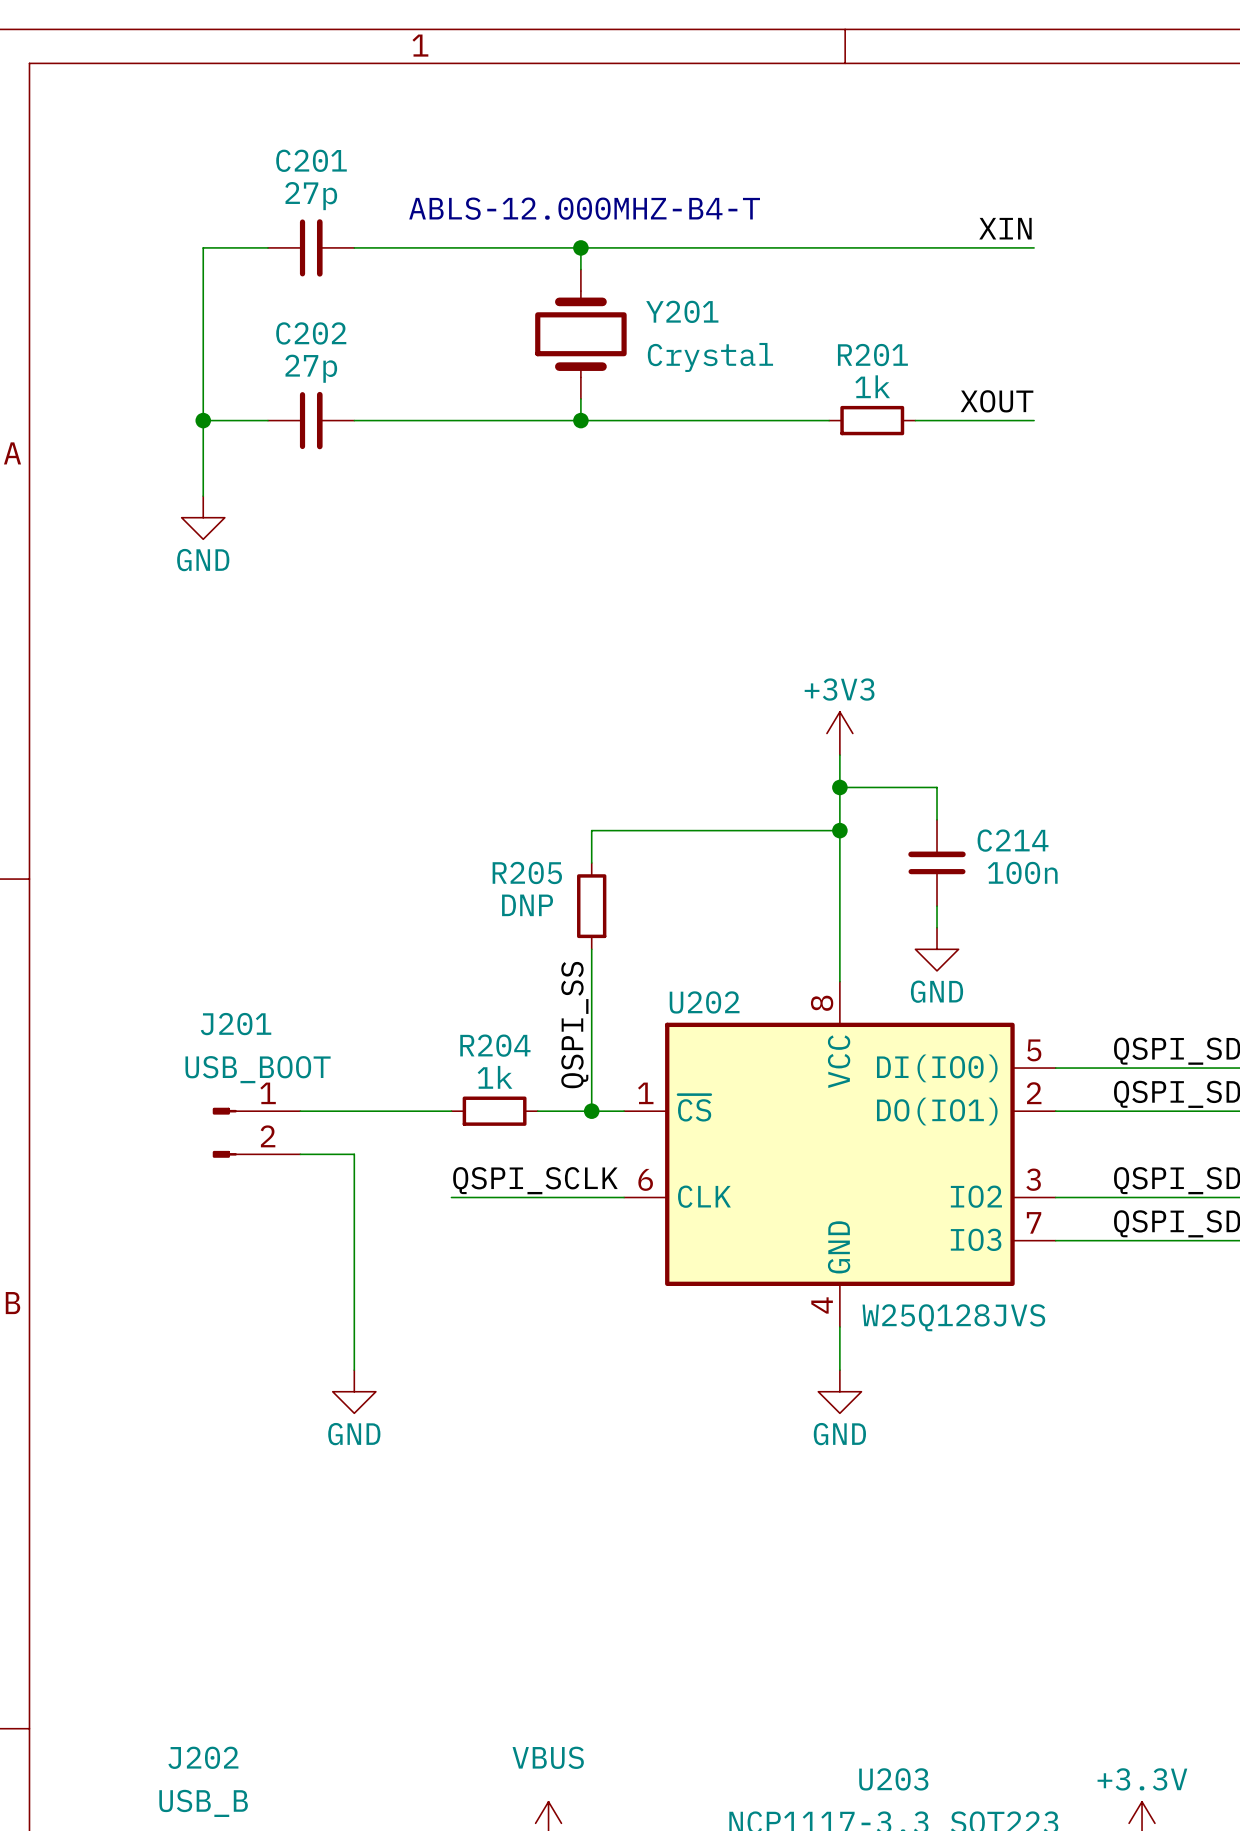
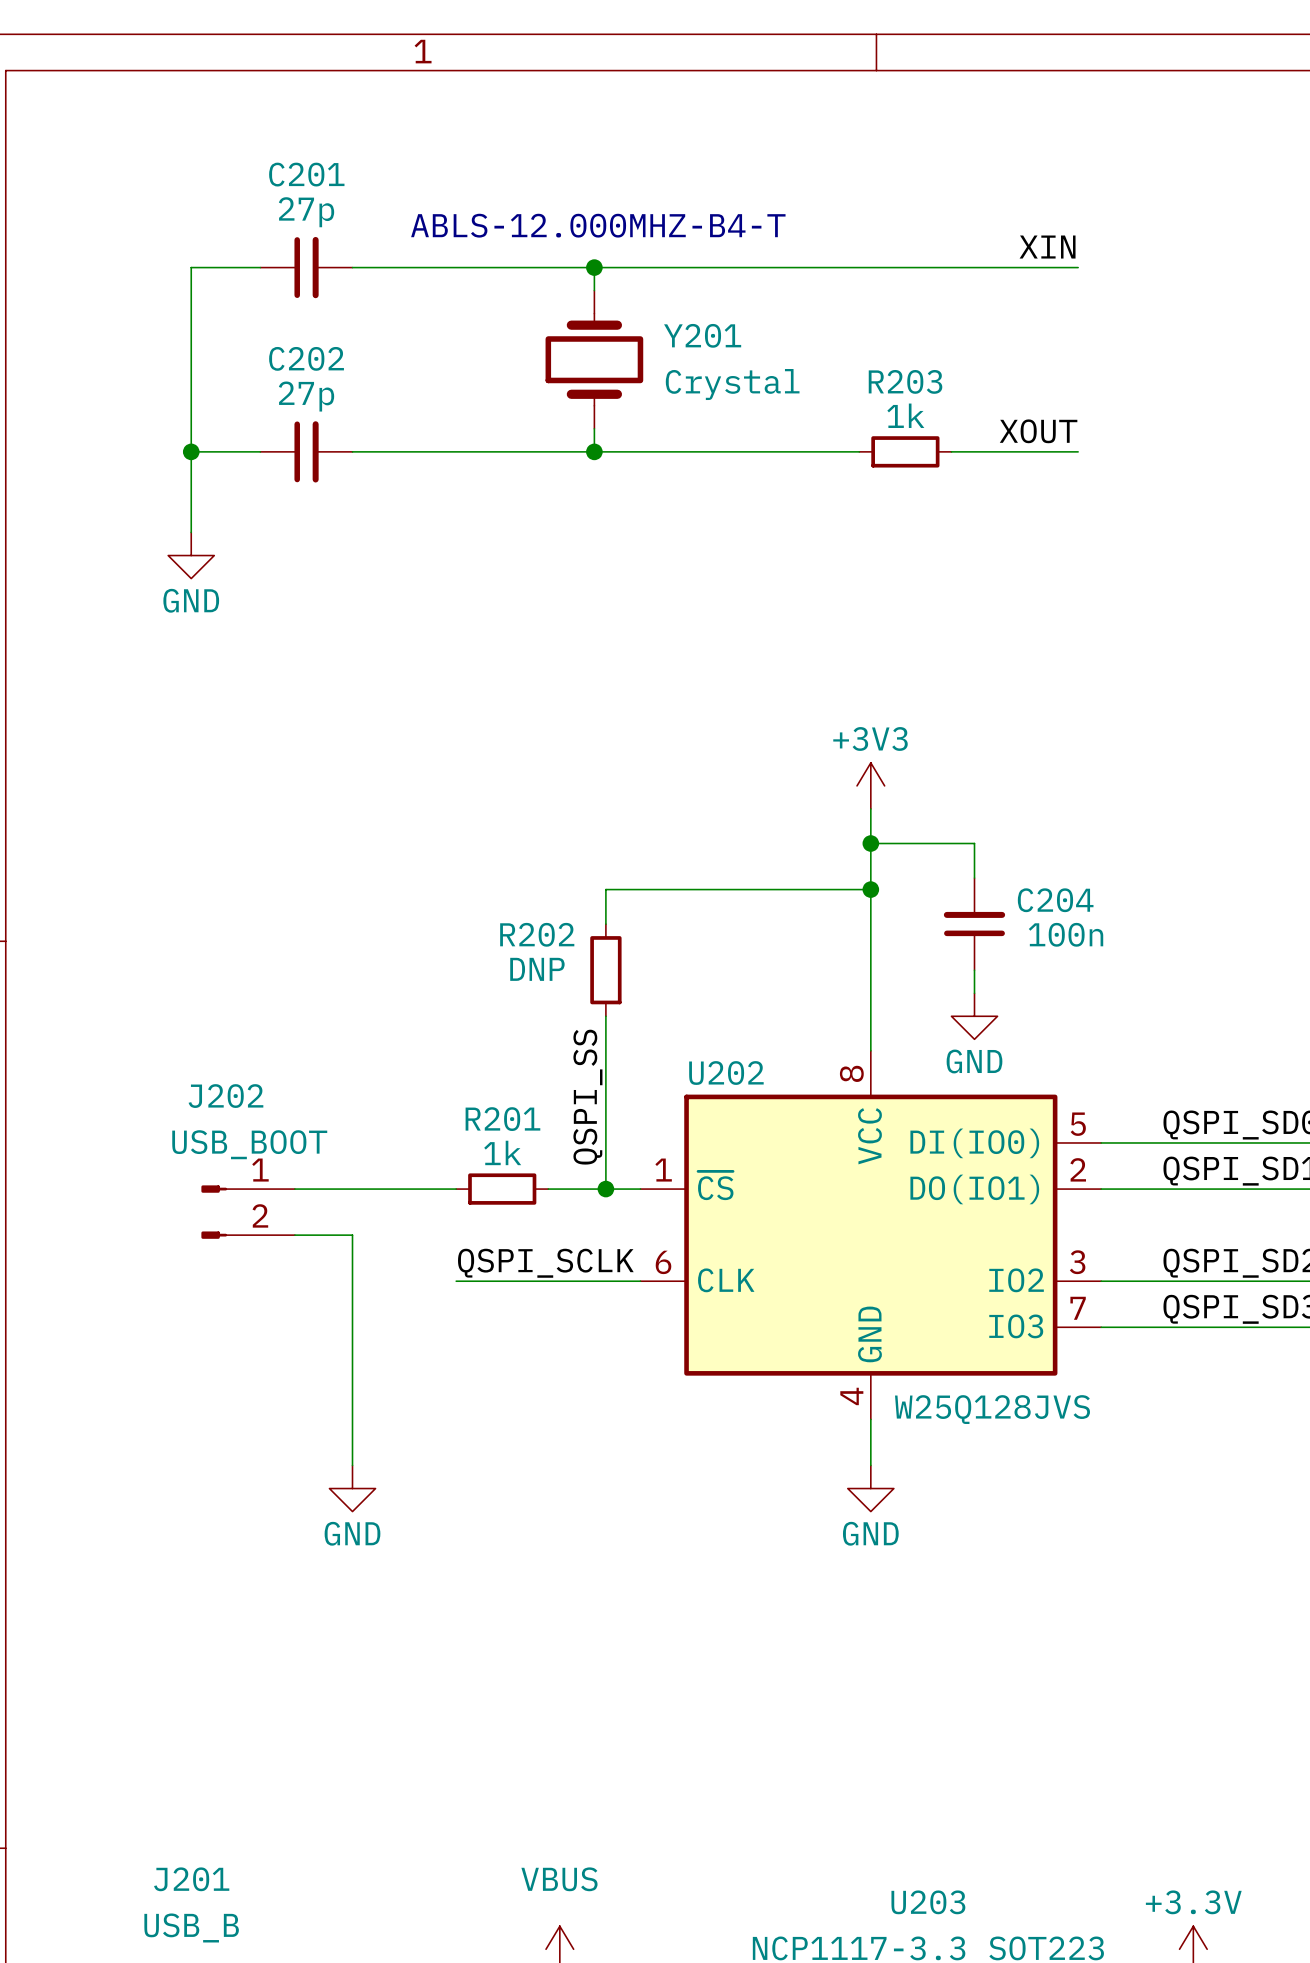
R201 name: R201 (872, 355) -> R203 (905, 381)
C214 name: C214 (1013, 840) -> C204 (1055, 900)
R205 name: R205 (527, 872) -> R202 (537, 934)
J201 name: J201 (236, 1024) -> J202 (225, 1096)
R204 name: R204 (495, 1045) -> R201 (502, 1119)
J202 name: J202 (203, 1757) -> J201 (191, 1879)

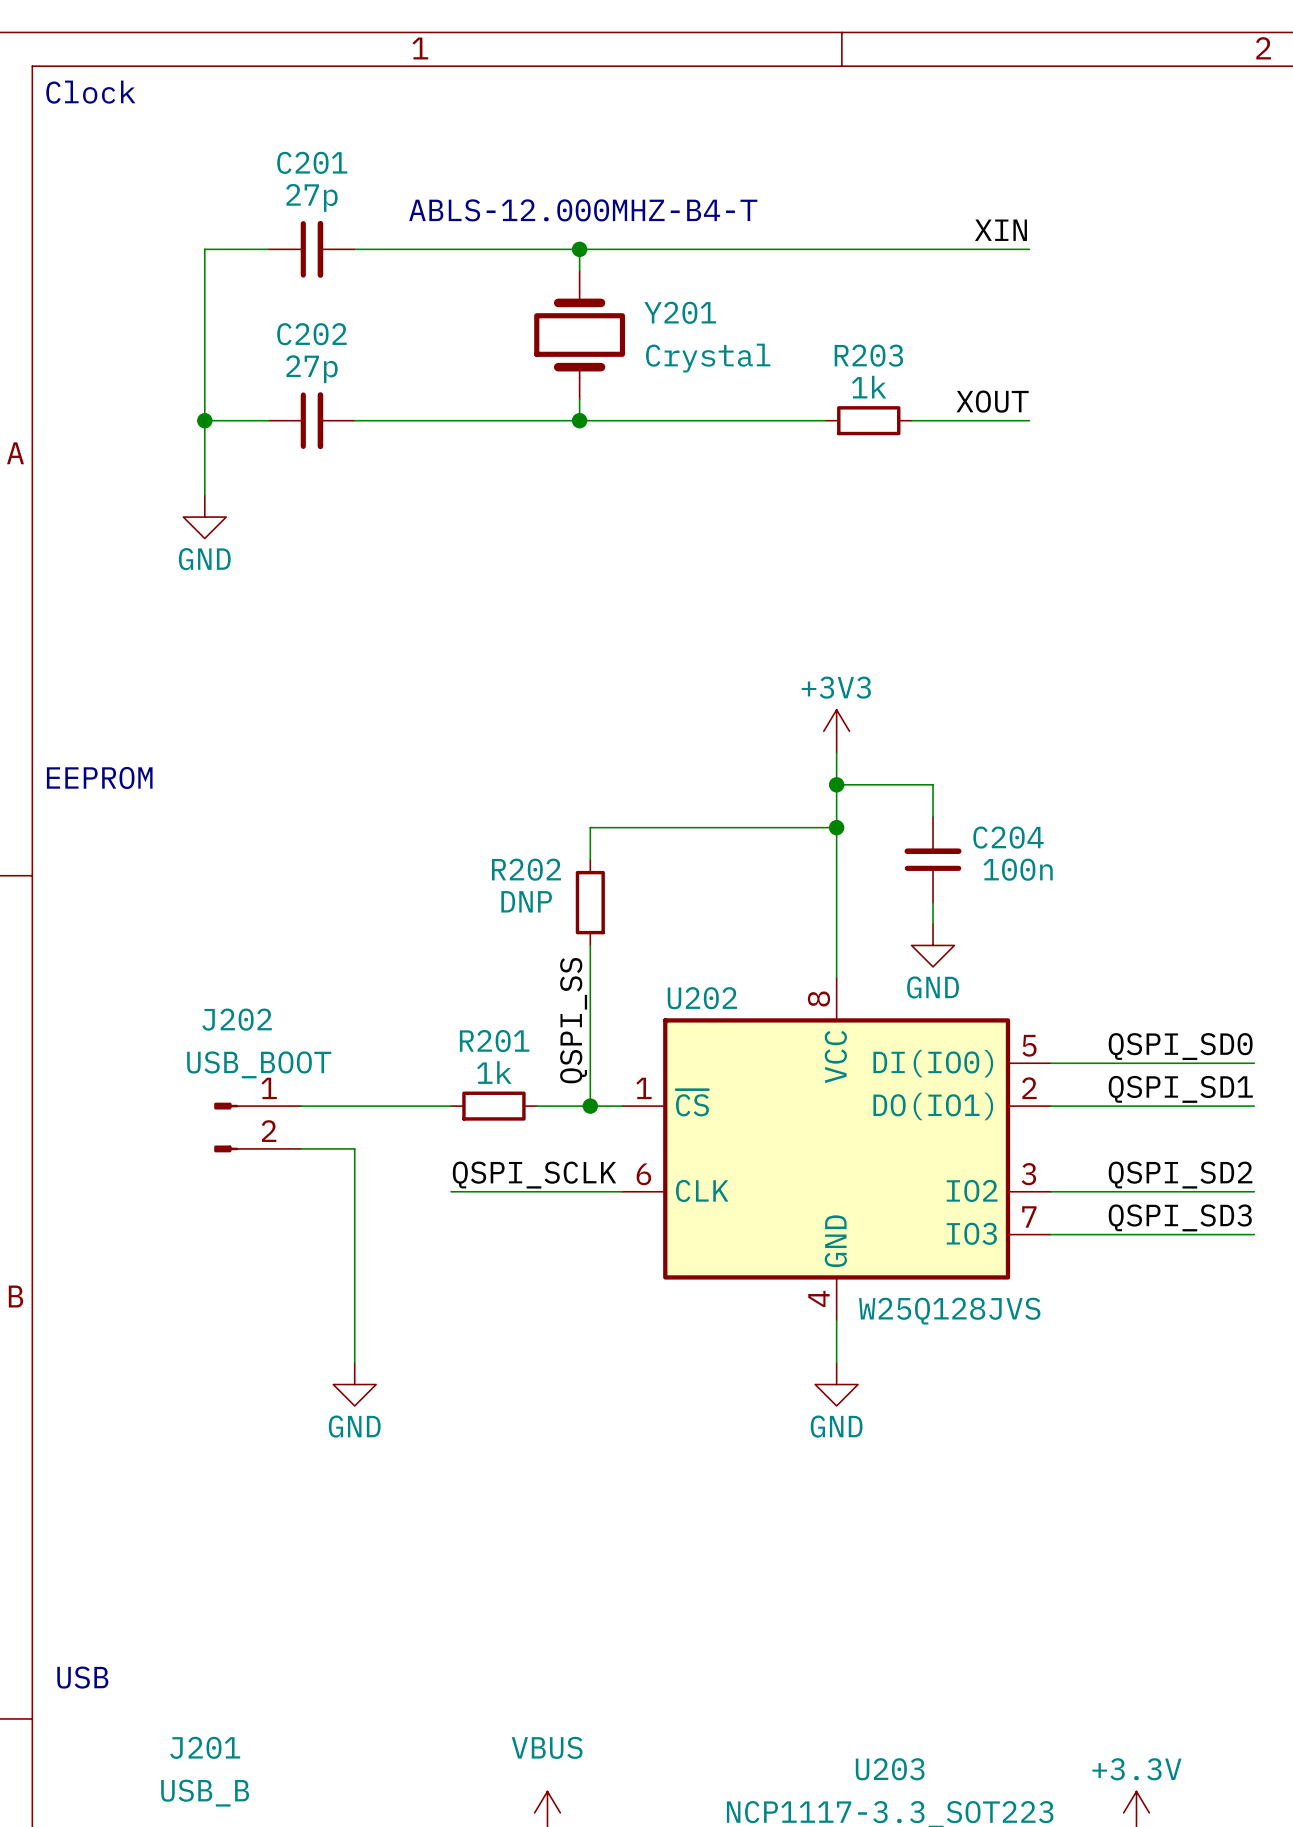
text: none -> Clock (90, 92)
text: none -> EEPROM (99, 777)
text: none -> USB (82, 1677)

